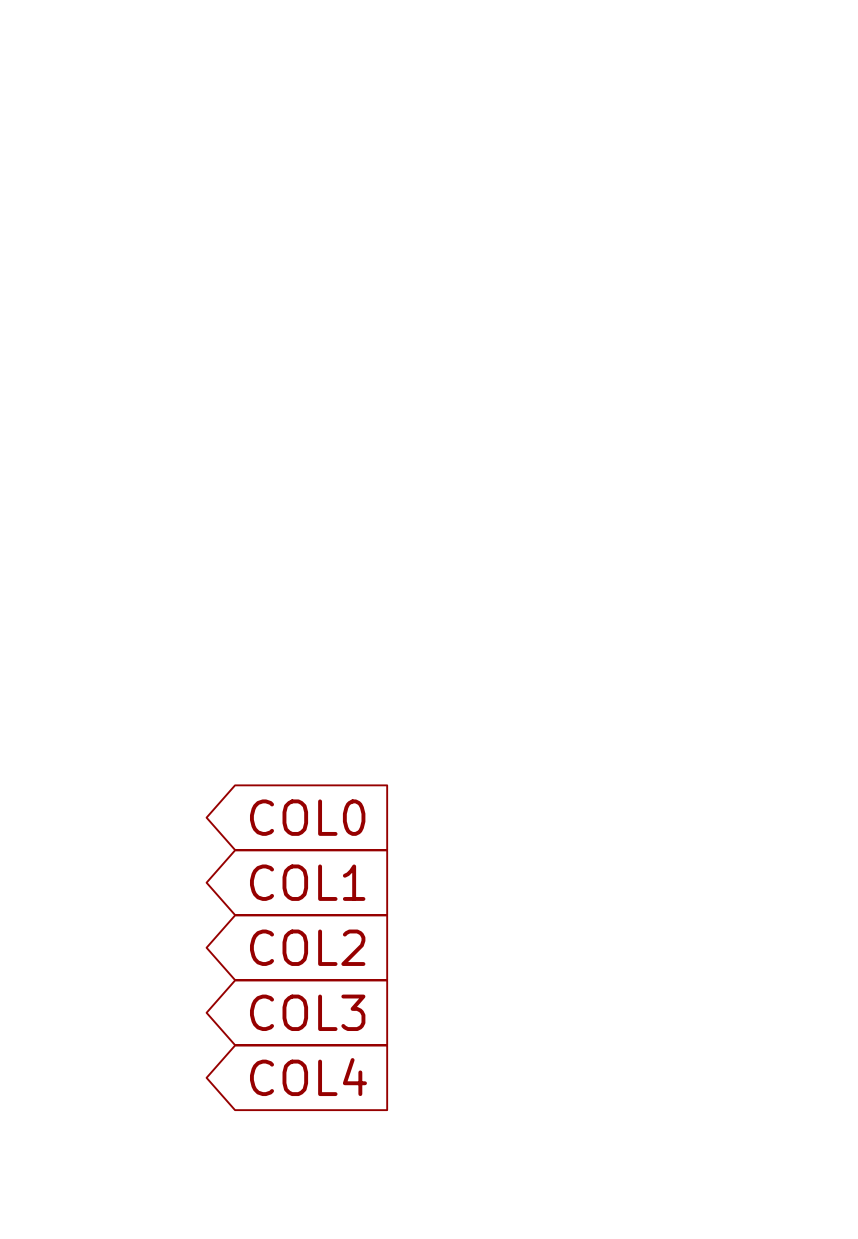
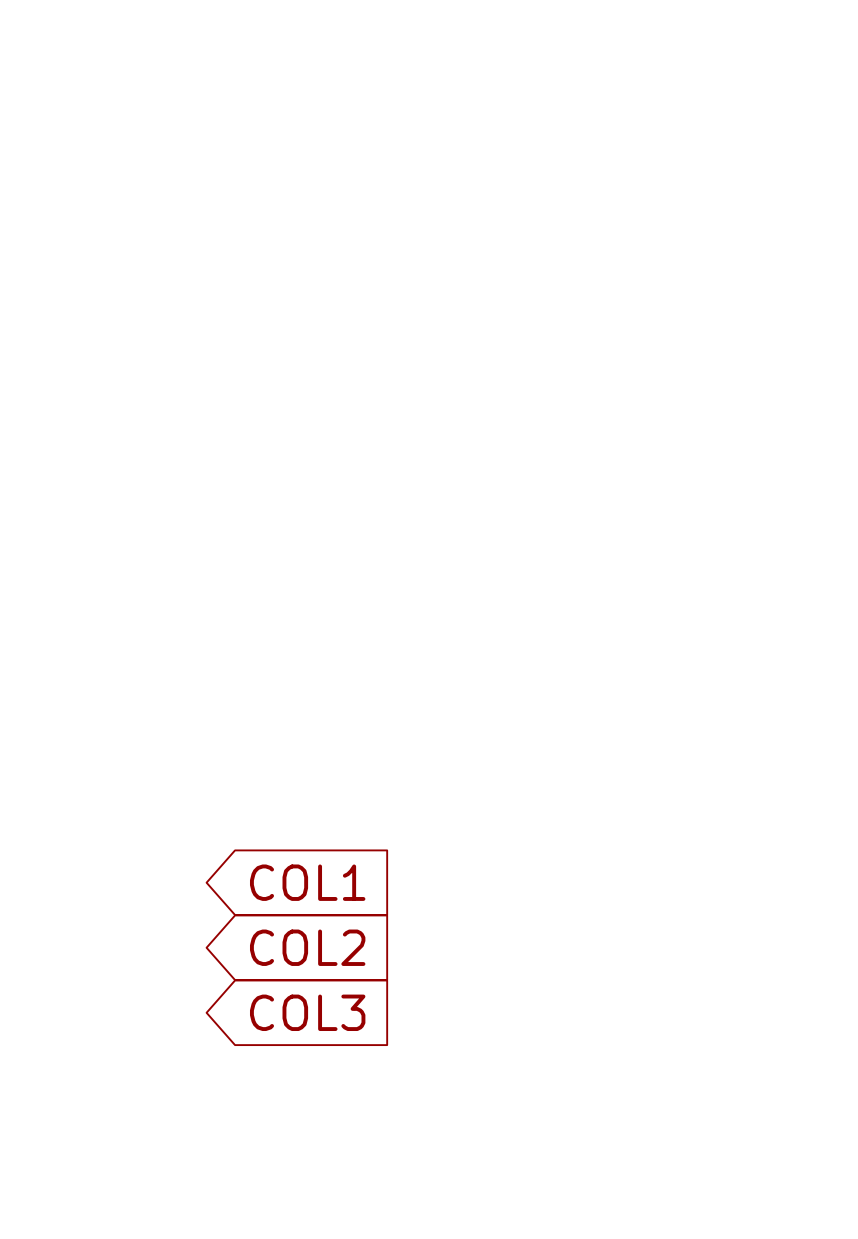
global label: COL0 (307, 817) -> none
global label: COL4 (308, 1077) -> none

